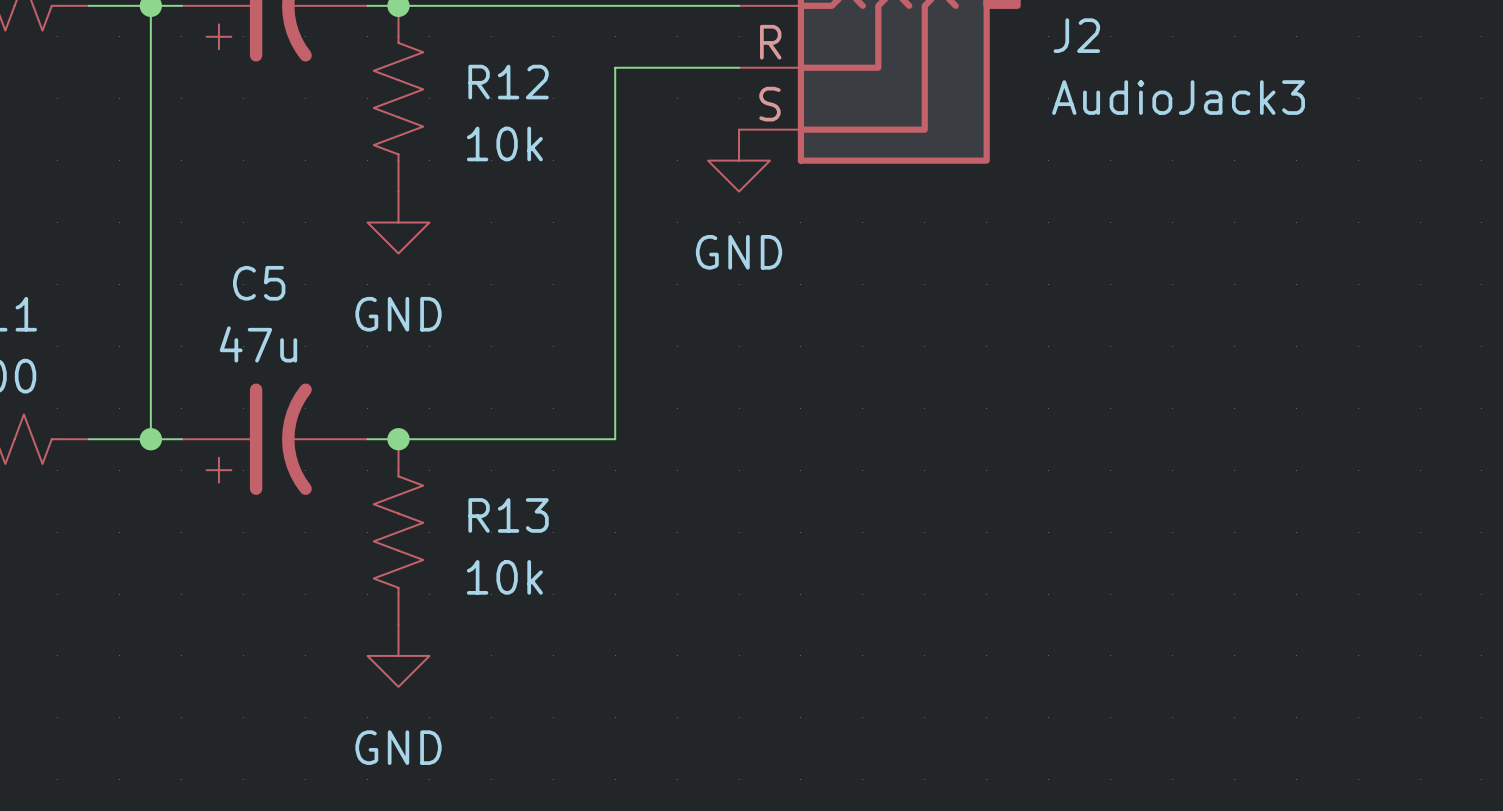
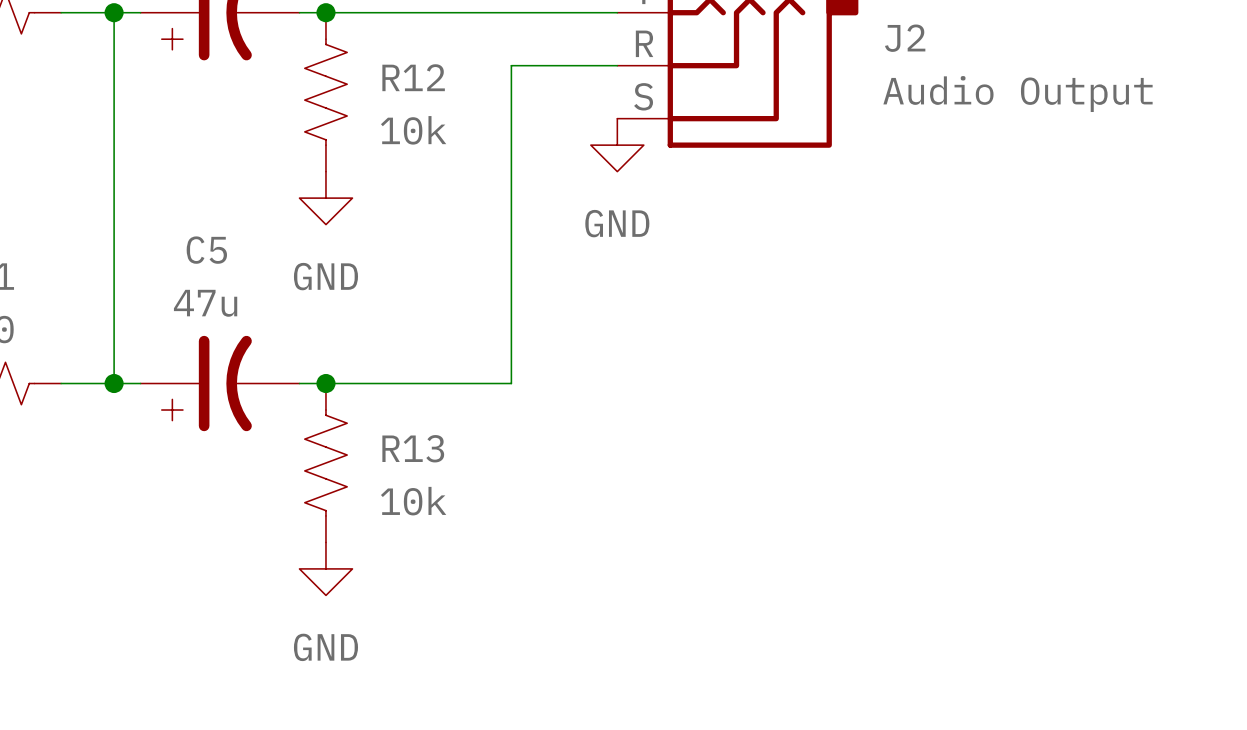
J2 value: AudioJack3 (1178, 97) -> Audio Output (1017, 94)

